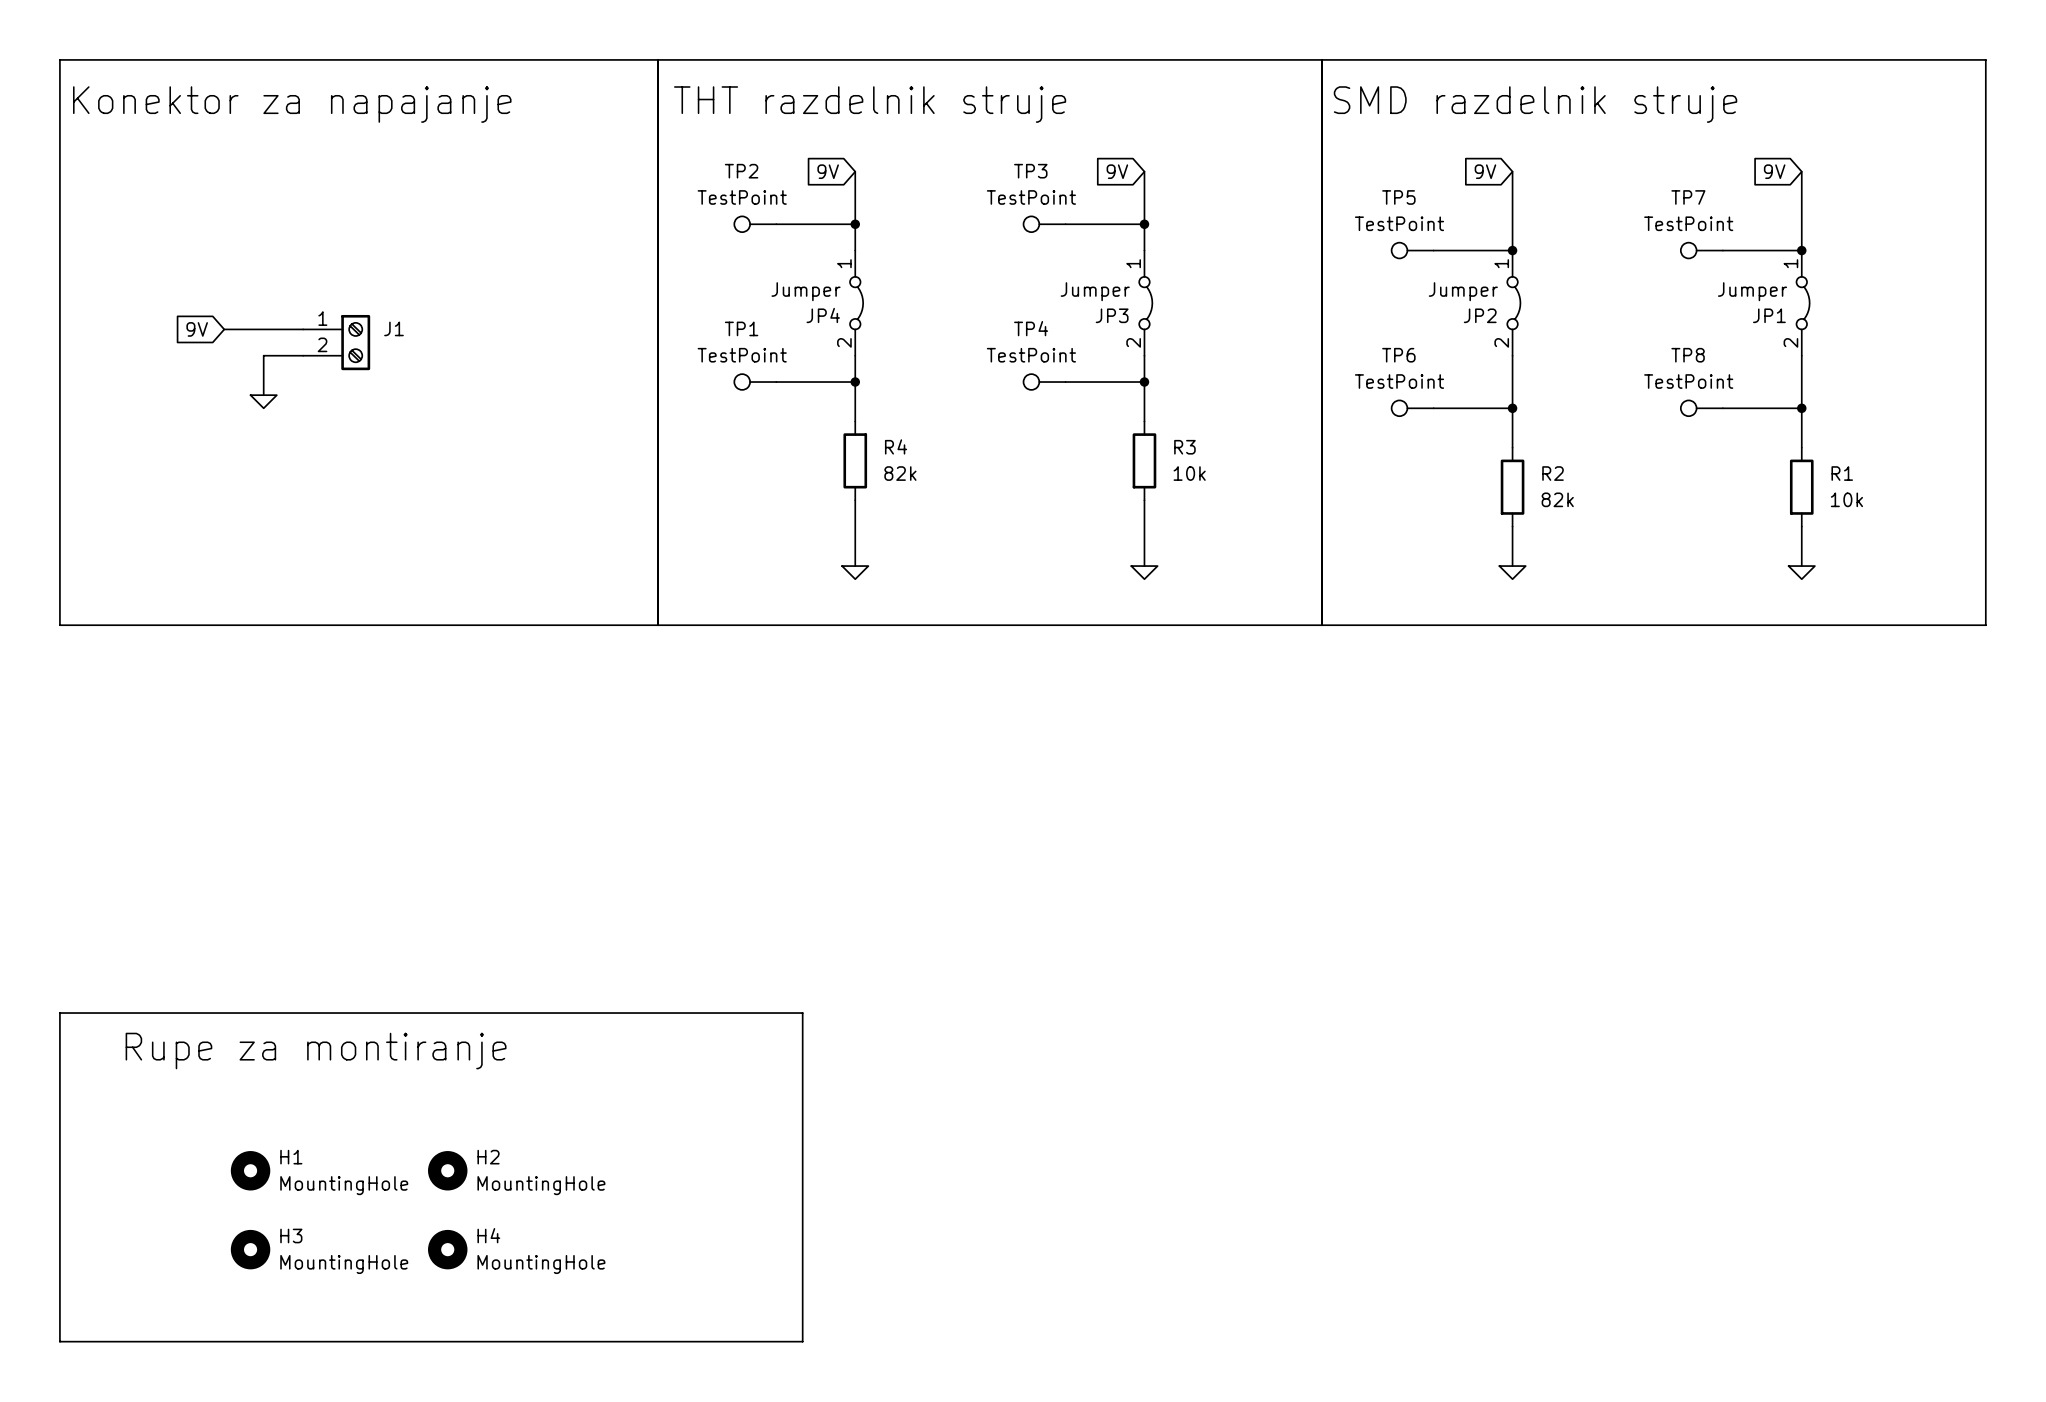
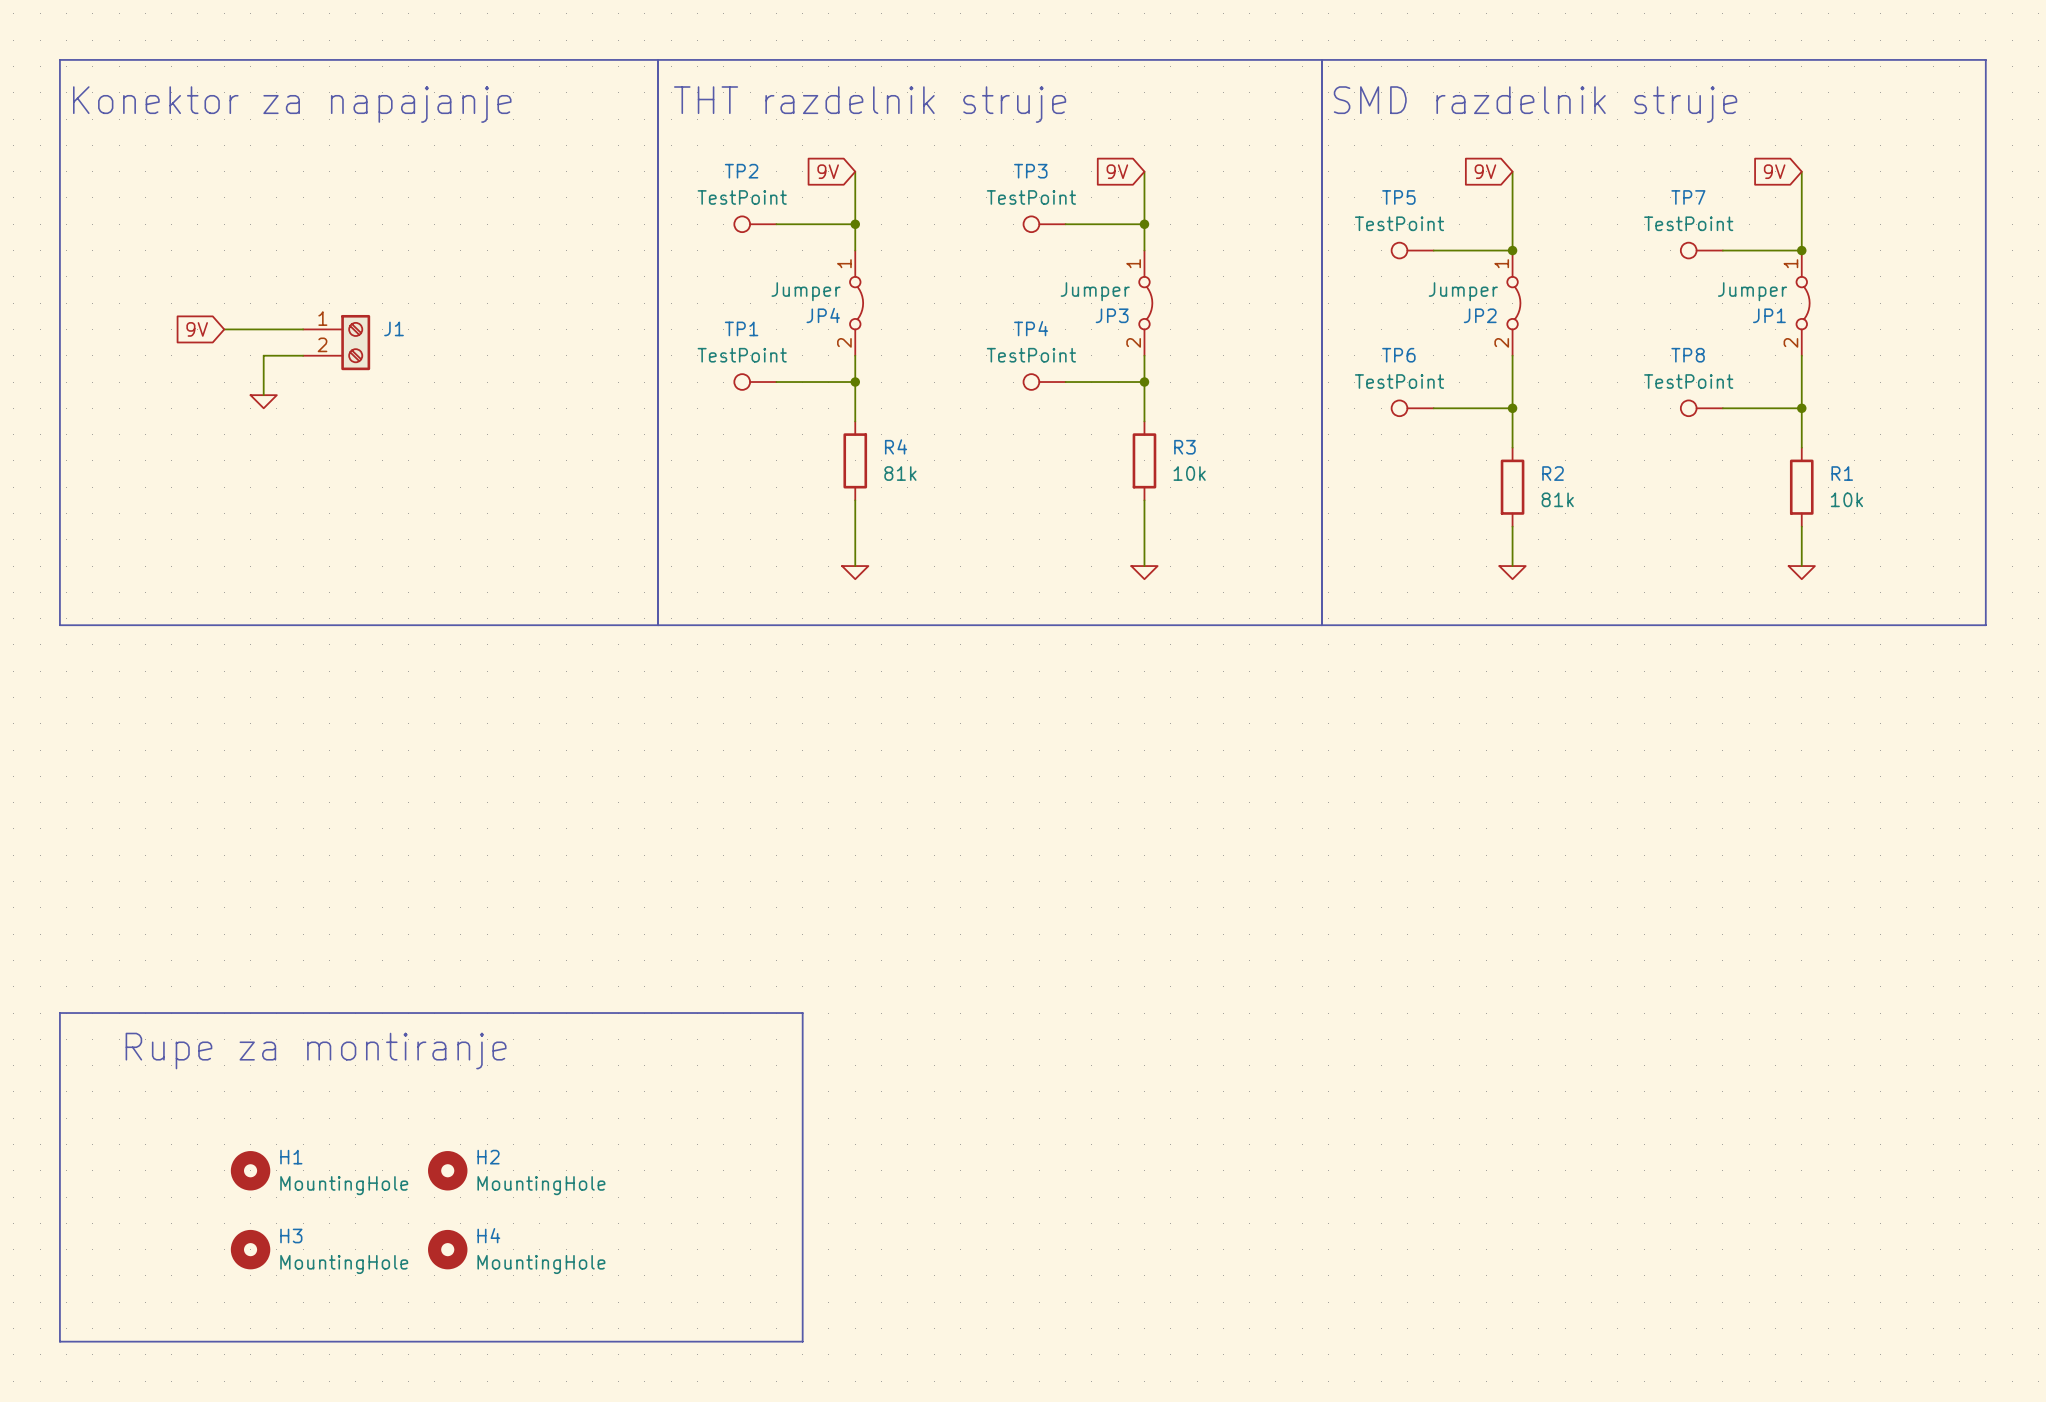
R4 value: 82k (900, 473) -> 81k (900, 473)
R2 value: 82k (1557, 499) -> 81k (1557, 499)

